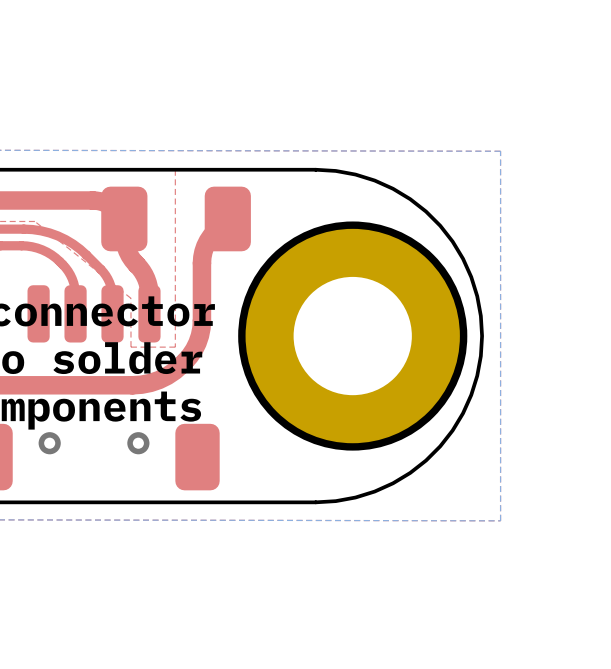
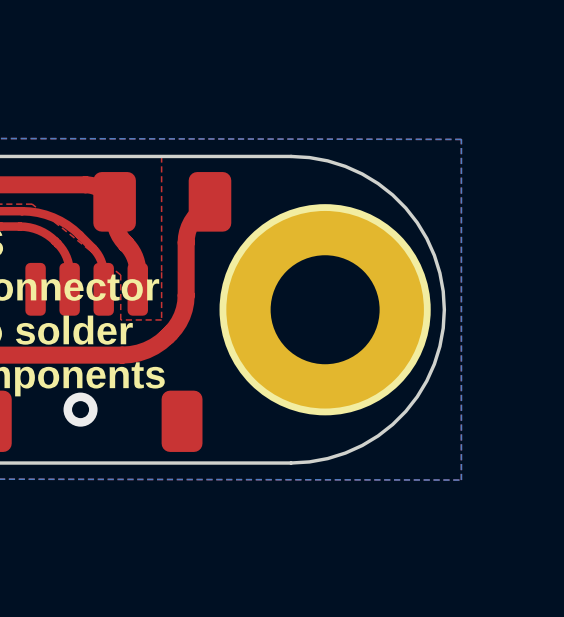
via: (49, 443) -> none
via: (138, 443) -> none
via: none -> (80, 409)

